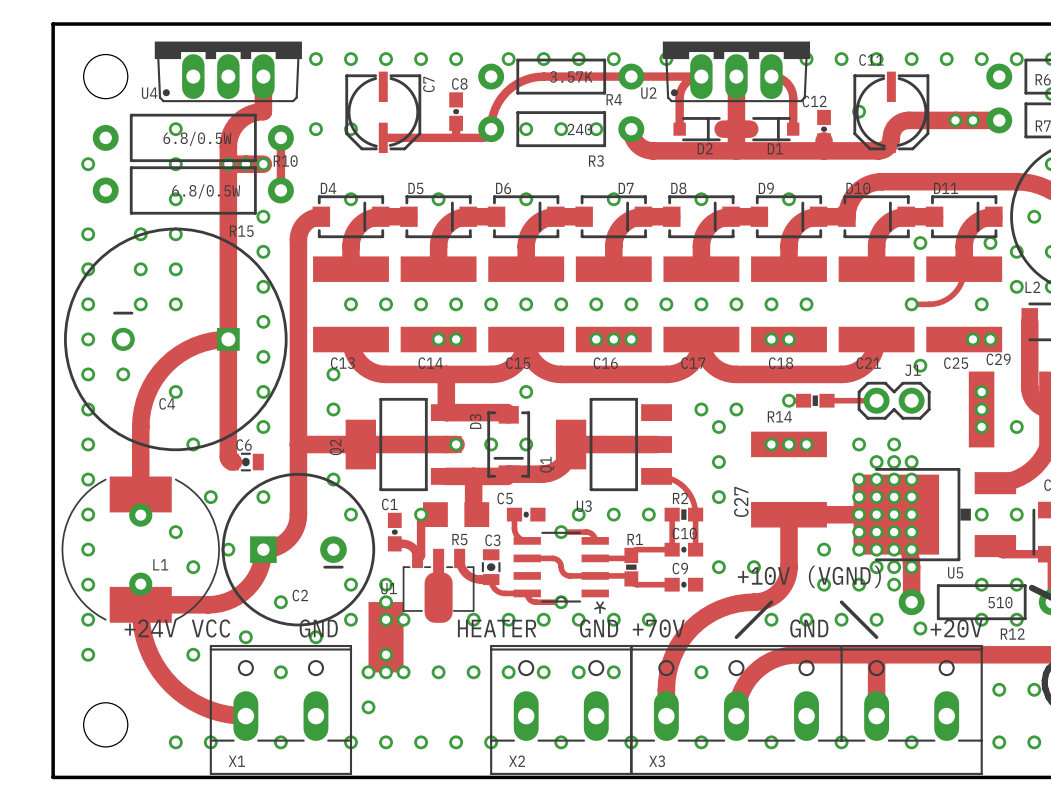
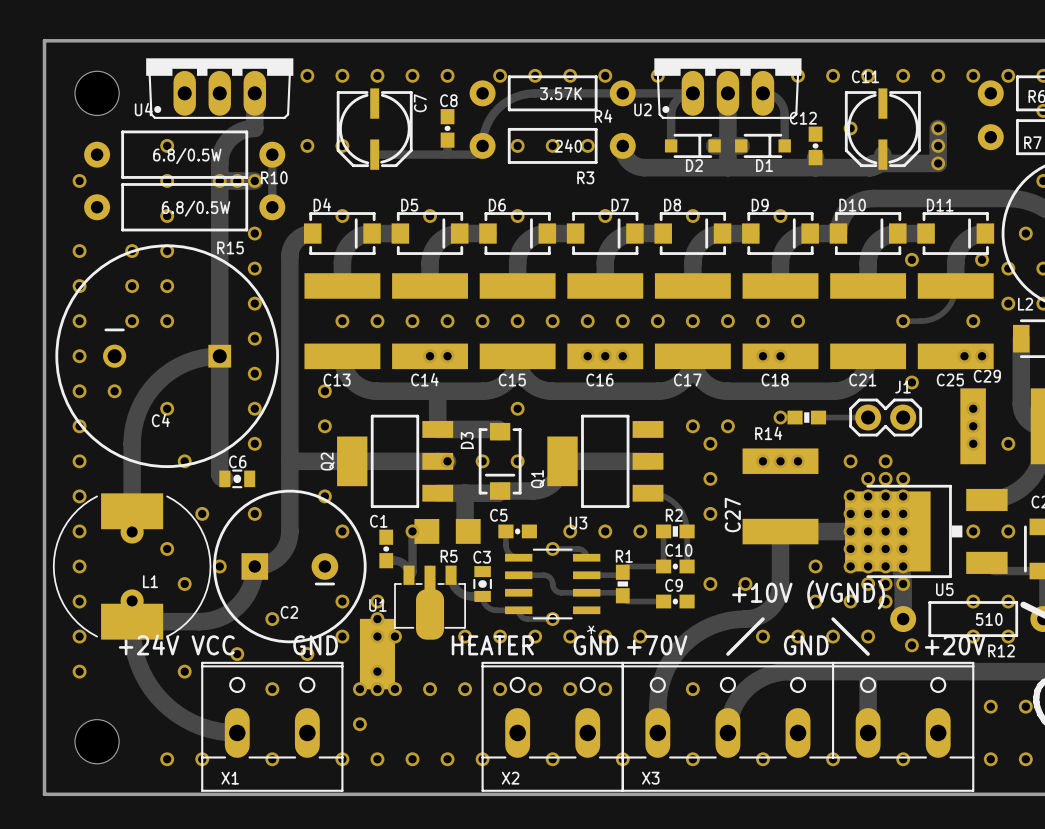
track: none -> (938, 128) (938, 163) (874, 163) (869, 167)
via: none -> (938, 128)
via: (955, 120) -> none
via: (972, 120) -> none
track: (999, 120) (906, 120) (894, 127) (891, 137) -> none
via: none -> (938, 145)
via: none -> (938, 163)

